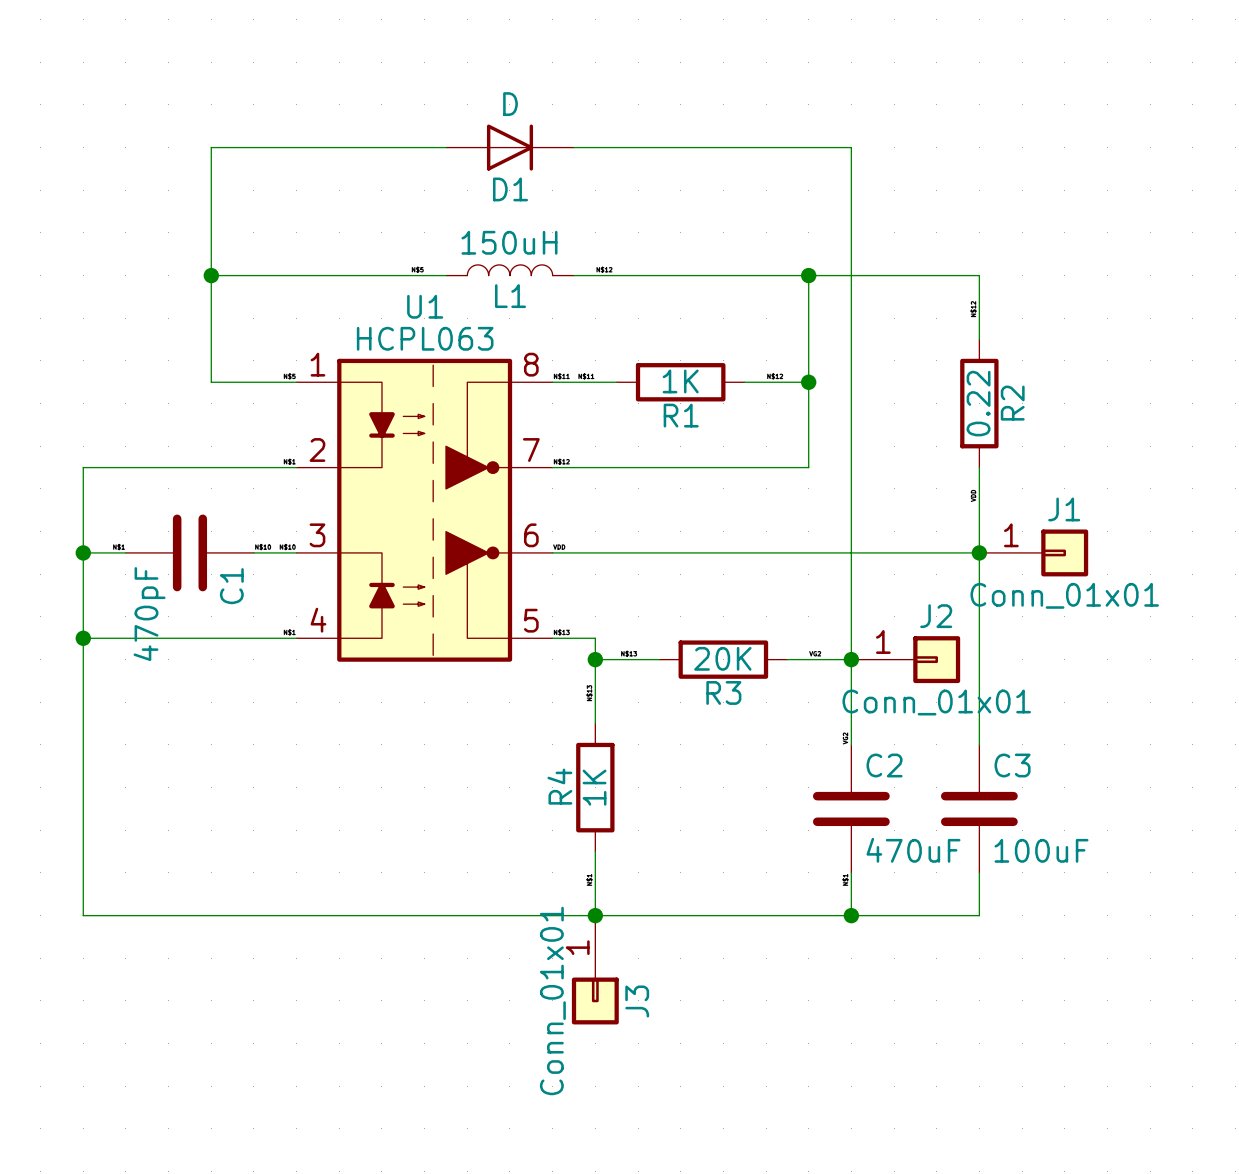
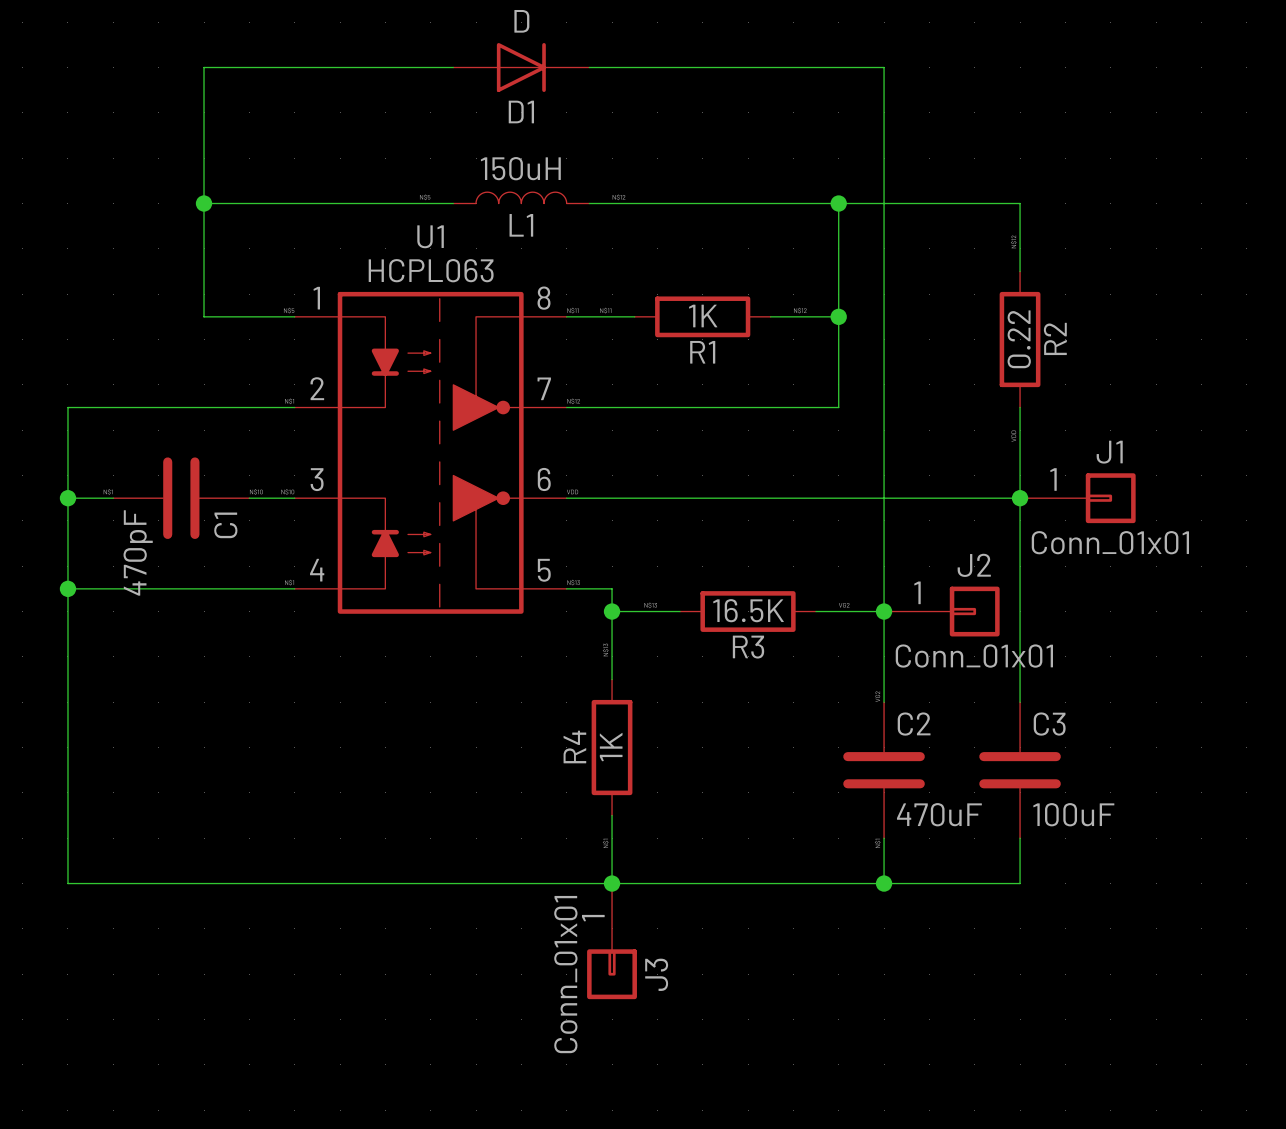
R3 value: 20K (722, 658) -> 16.5K (748, 610)

